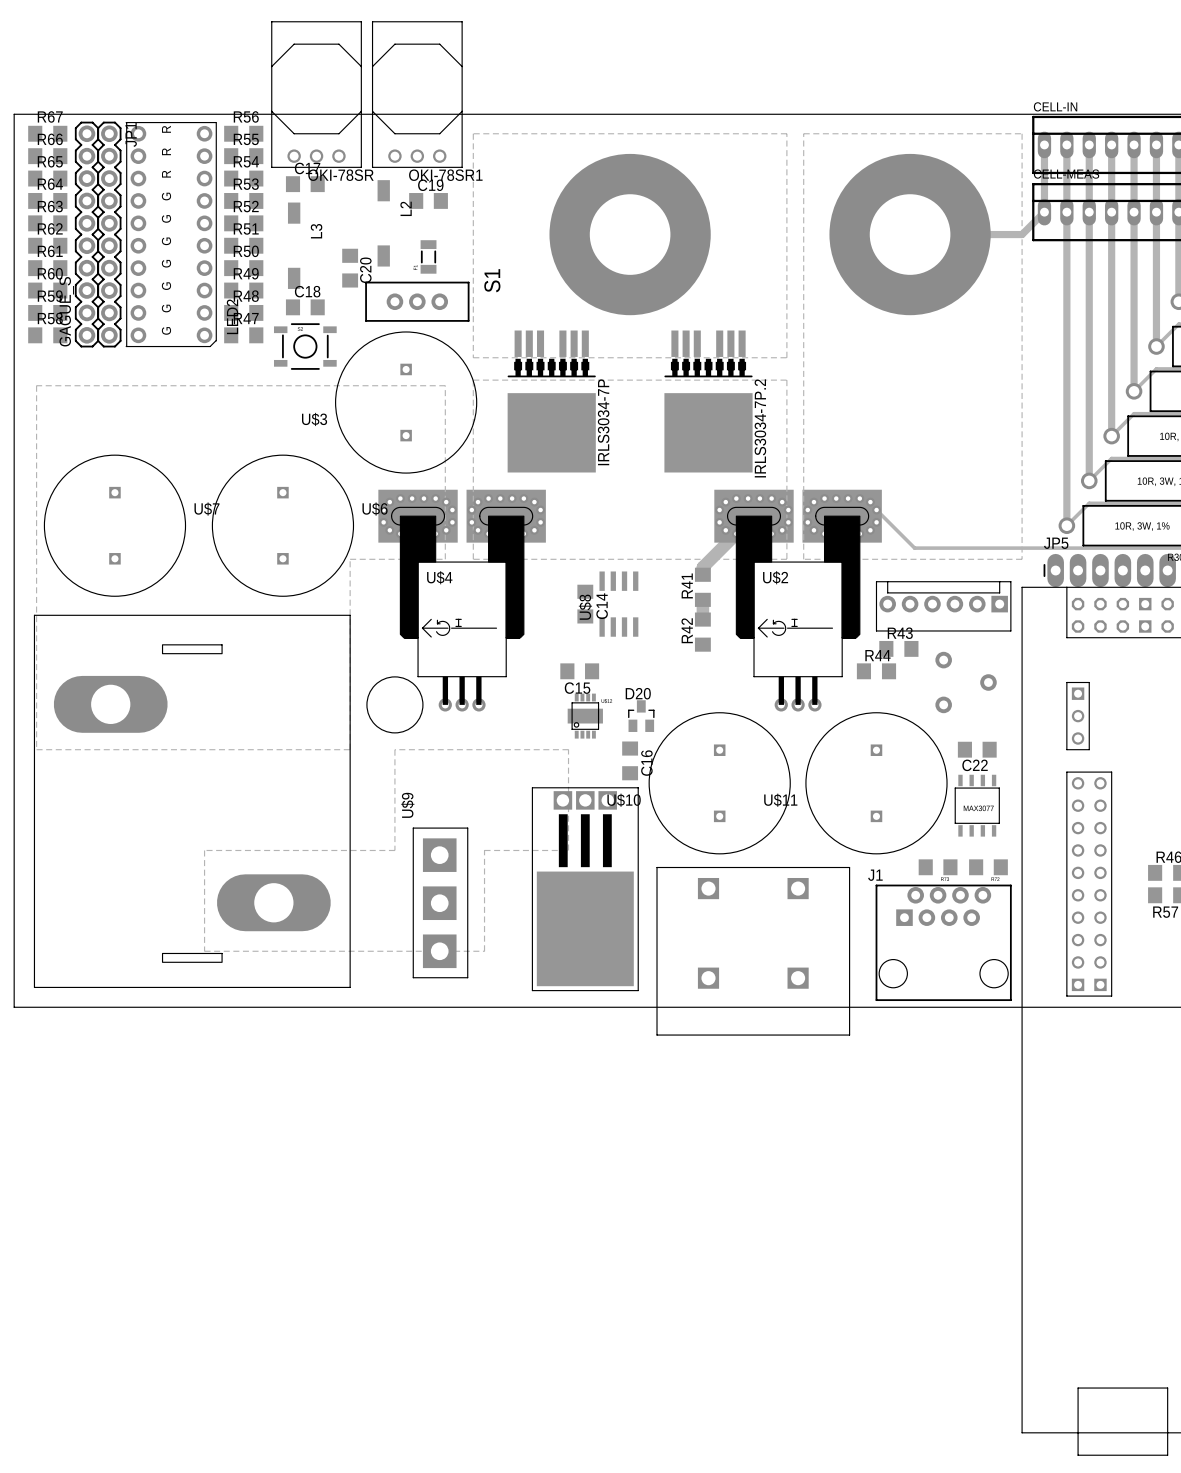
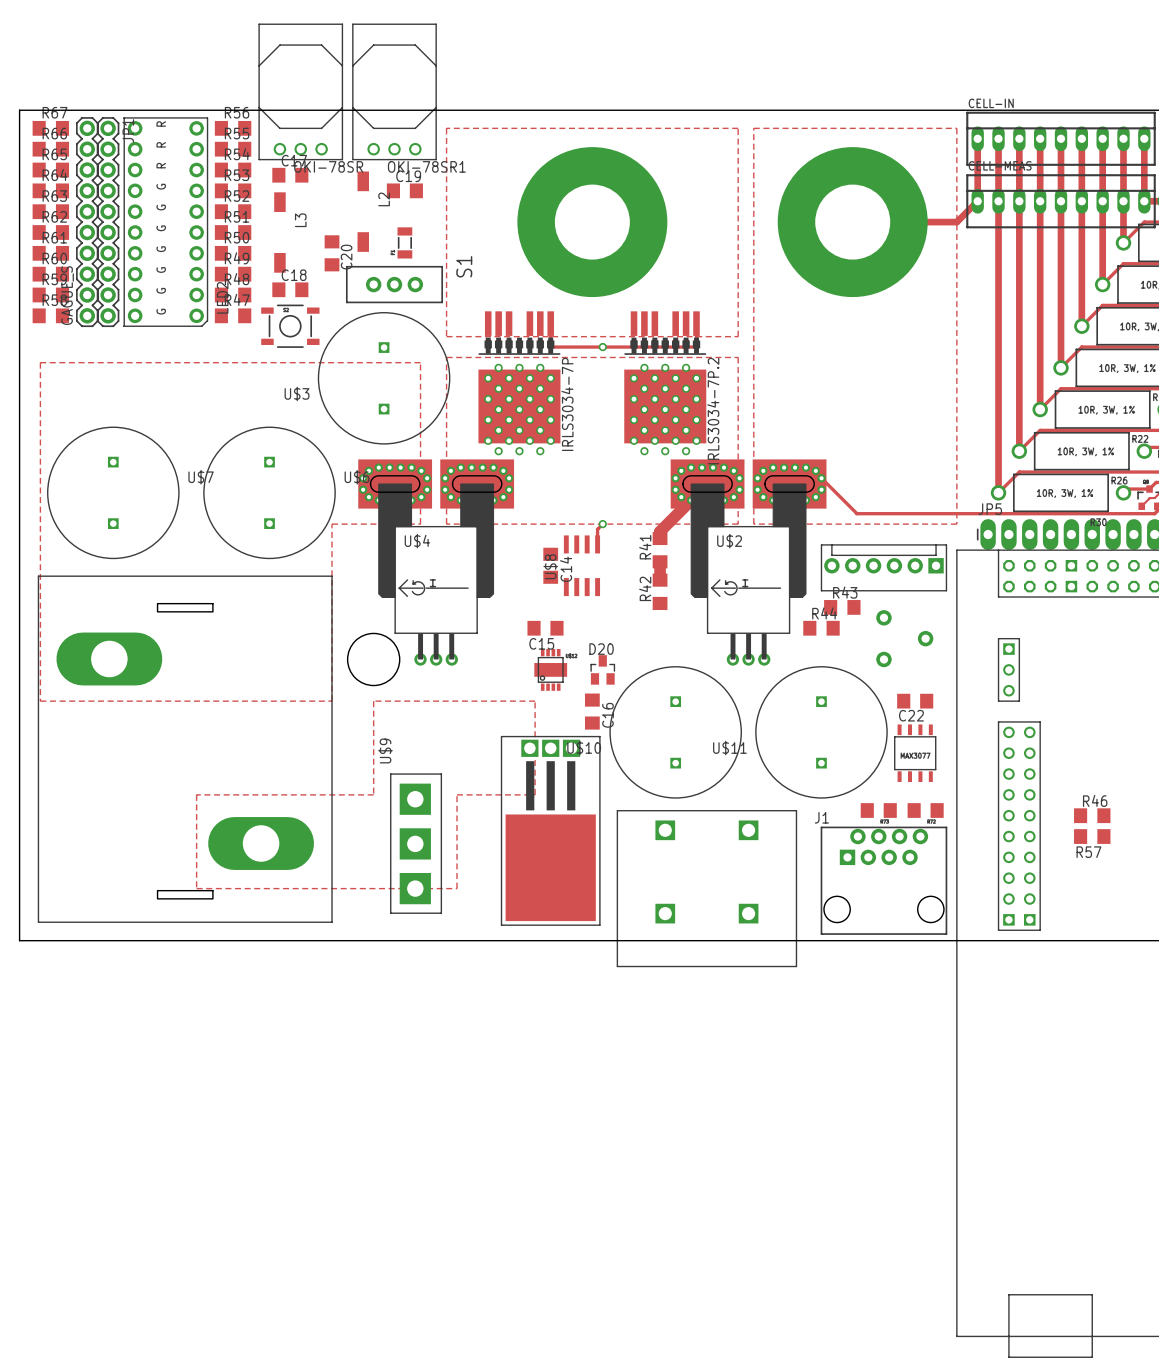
track: none -> (550, 323) (550, 347) (696, 347) (696, 323)
via: none -> (602, 347)
via: none -> (498, 367)
via: none -> (519, 367)
via: none -> (540, 367)
via: none -> (644, 367)
via: none -> (665, 367)
via: none -> (686, 367)
via: none -> (488, 378)
via: none -> (509, 378)
via: none -> (529, 378)
via: none -> (550, 378)
via: none -> (634, 378)
via: none -> (654, 378)
via: none -> (675, 378)
via: none -> (696, 378)
via: none -> (498, 388)
via: none -> (519, 388)
via: none -> (540, 388)
via: none -> (644, 388)
via: none -> (665, 388)
via: none -> (686, 388)
via: none -> (488, 399)
via: none -> (509, 399)
via: none -> (529, 399)
via: none -> (550, 399)
via: none -> (634, 399)
via: none -> (654, 399)
via: none -> (675, 399)
via: none -> (696, 399)
via: none -> (498, 409)
via: none -> (519, 409)
via: none -> (540, 409)
via: none -> (644, 409)
via: none -> (665, 409)
via: none -> (686, 409)
via: none -> (488, 419)
via: none -> (509, 419)
via: none -> (529, 419)
via: none -> (550, 419)
via: none -> (634, 419)
via: none -> (654, 419)
via: none -> (675, 419)
via: none -> (696, 419)
via: none -> (498, 430)
via: none -> (519, 430)
via: none -> (540, 430)
via: none -> (644, 430)
via: none -> (665, 430)
via: none -> (686, 430)
via: none -> (488, 440)
via: none -> (509, 440)
via: none -> (529, 440)
via: none -> (550, 440)
via: none -> (634, 440)
via: none -> (654, 440)
via: none -> (675, 440)
via: none -> (696, 440)
via: none -> (498, 451)
via: none -> (519, 451)
via: none -> (540, 451)
via: none -> (644, 451)
via: none -> (665, 451)
via: none -> (686, 451)
track: none -> (602, 524) (597, 529) (597, 544)
via: none -> (602, 524)

